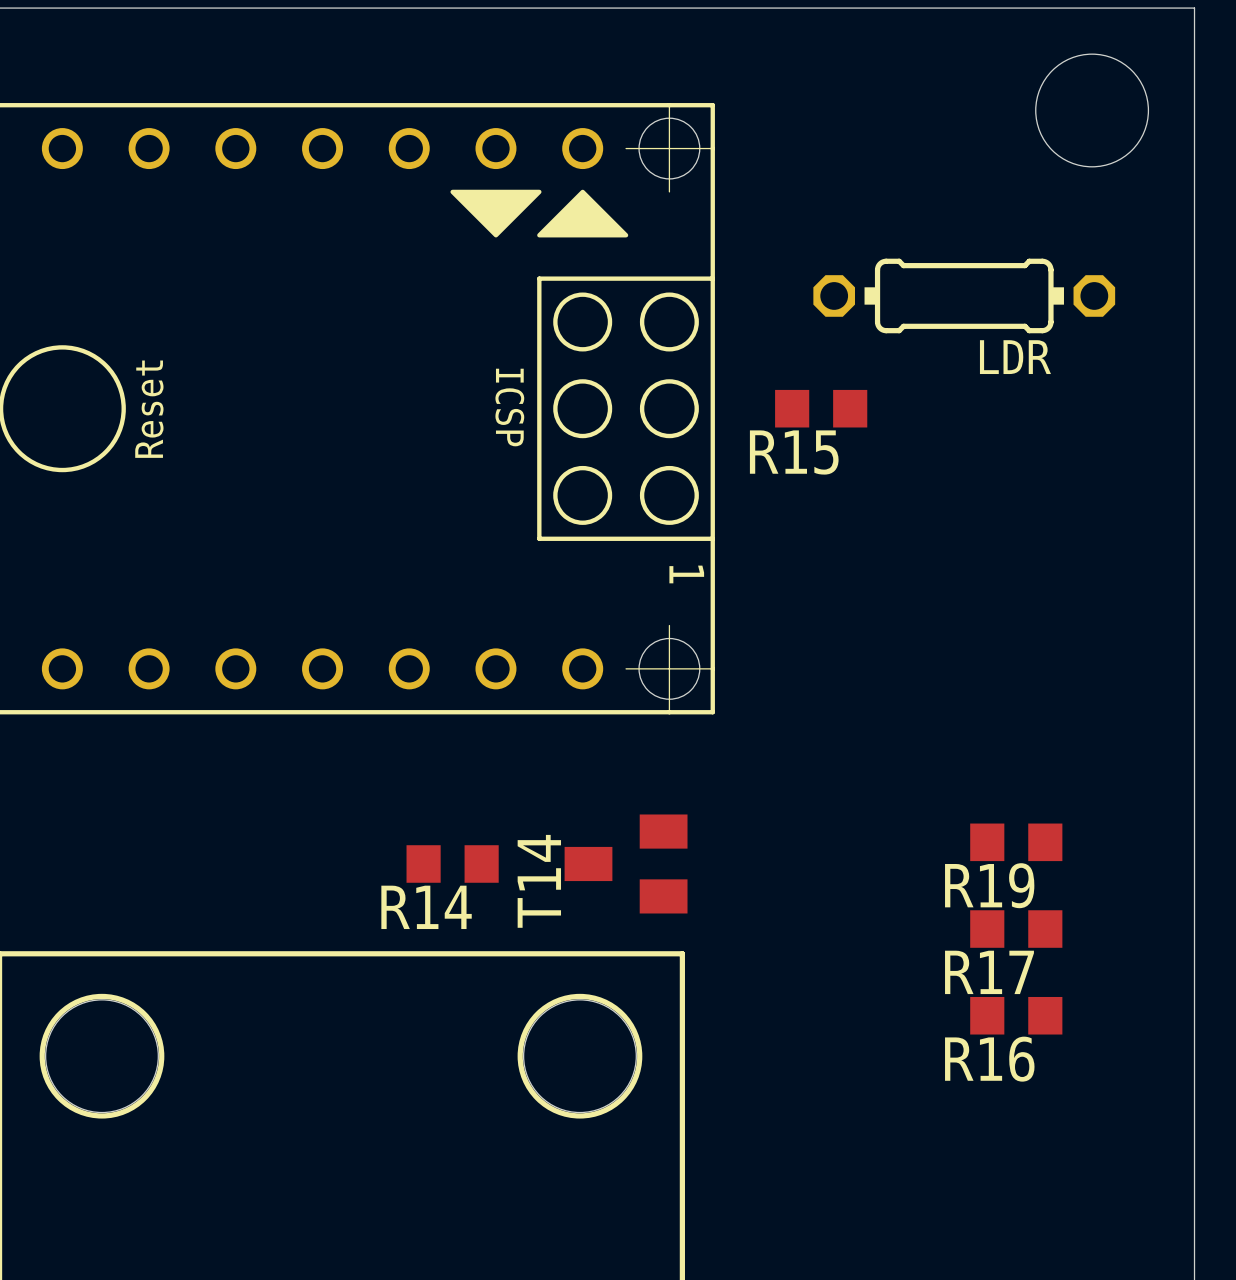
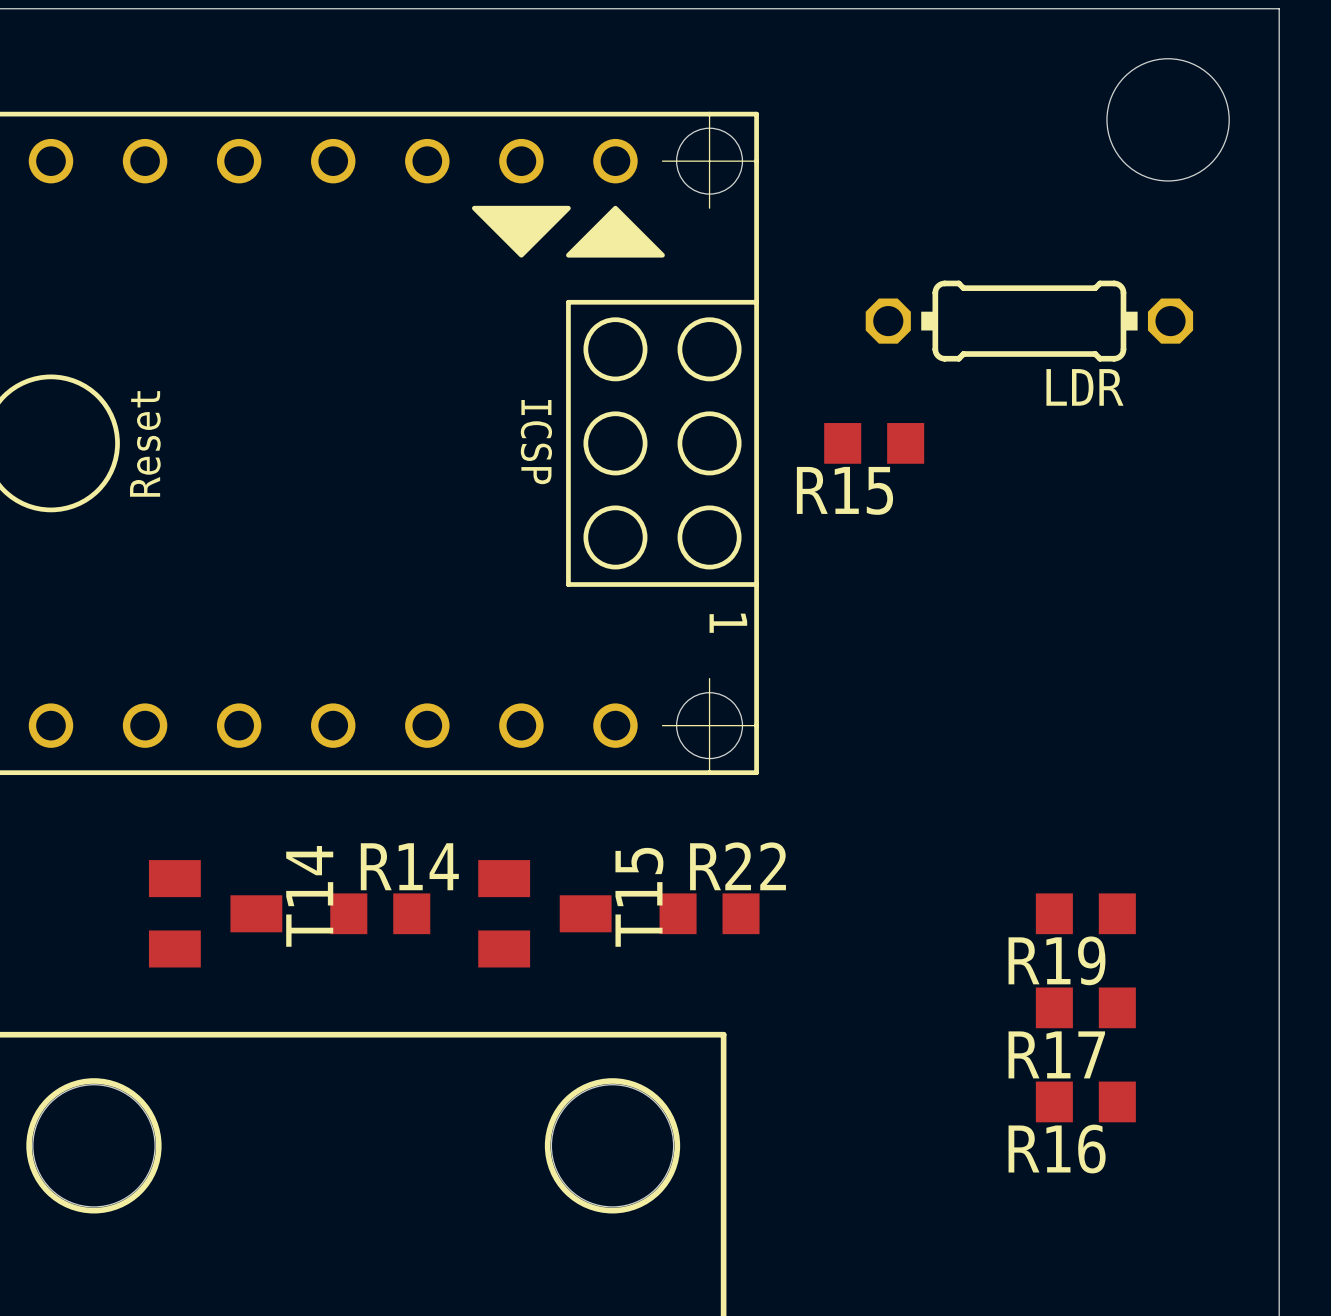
T15: none -> (544, 913)
R22: none -> (709, 913)
R14 position: (452, 863) -> (380, 913)
T14 rotation: 0° (626, 863) -> 180° (215, 913)
T14 position: (626, 863) -> (215, 913)
R14 name position: R14 (426, 907) -> R14 (409, 866)

